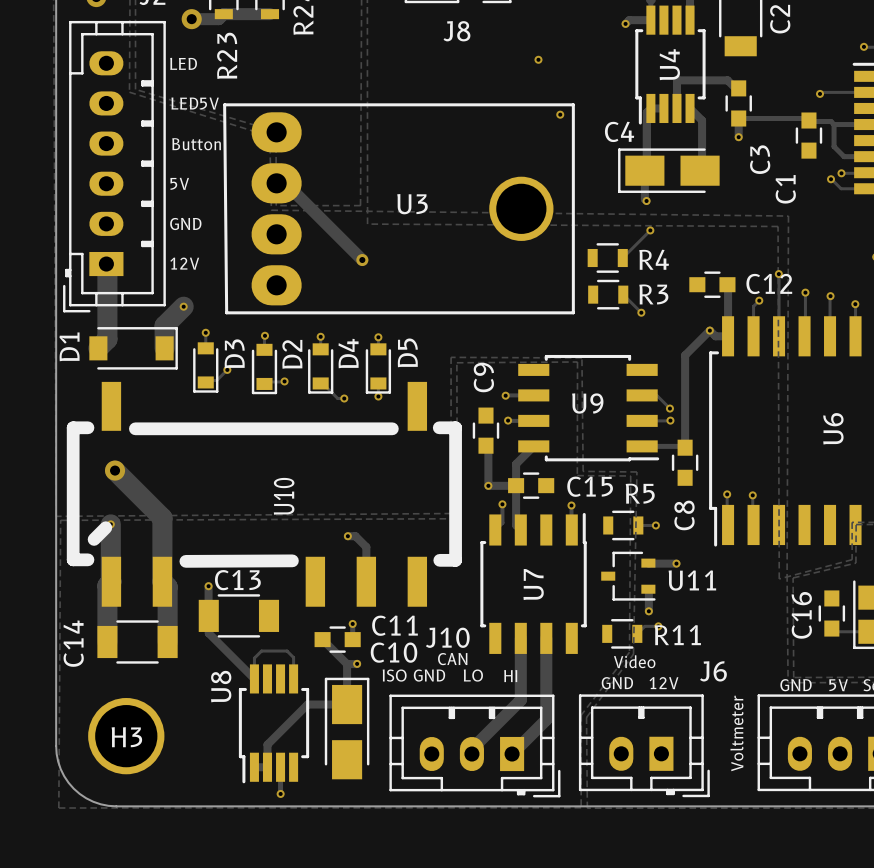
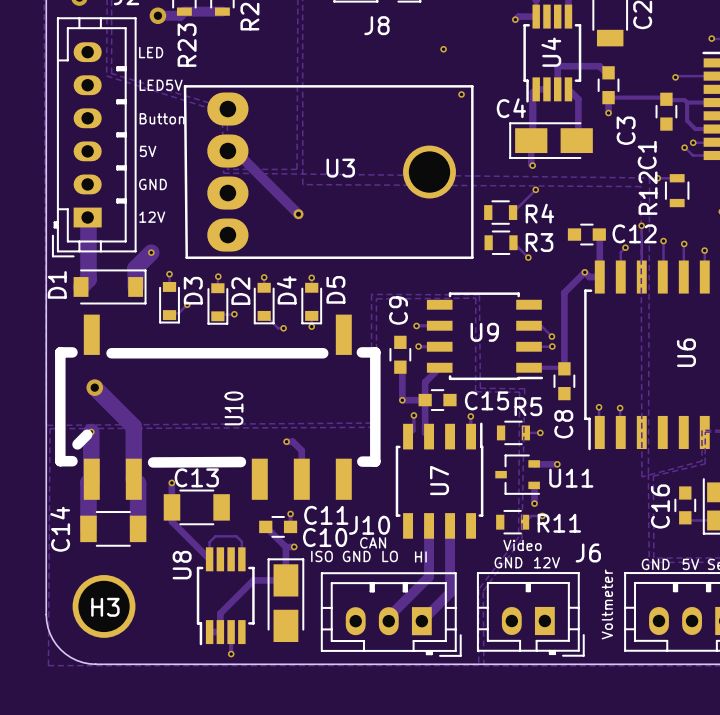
track: none -> (657, 178) (677, 178)
via: none -> (657, 178)
R12: none -> (677, 190)

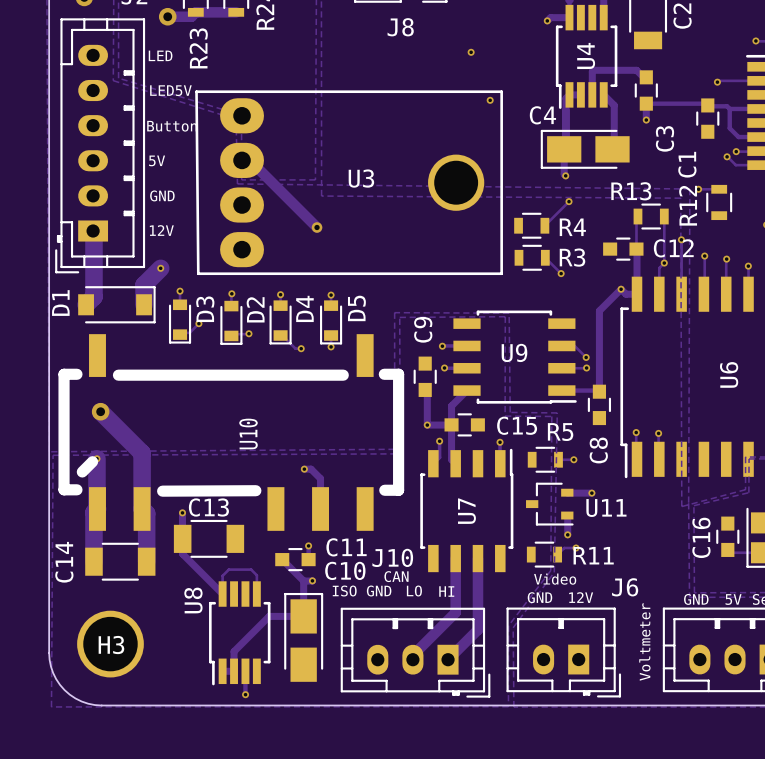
track: none -> (637, 216) (636, 249)
R13: none -> (651, 216)
track: none -> (664, 216) (664, 263)

